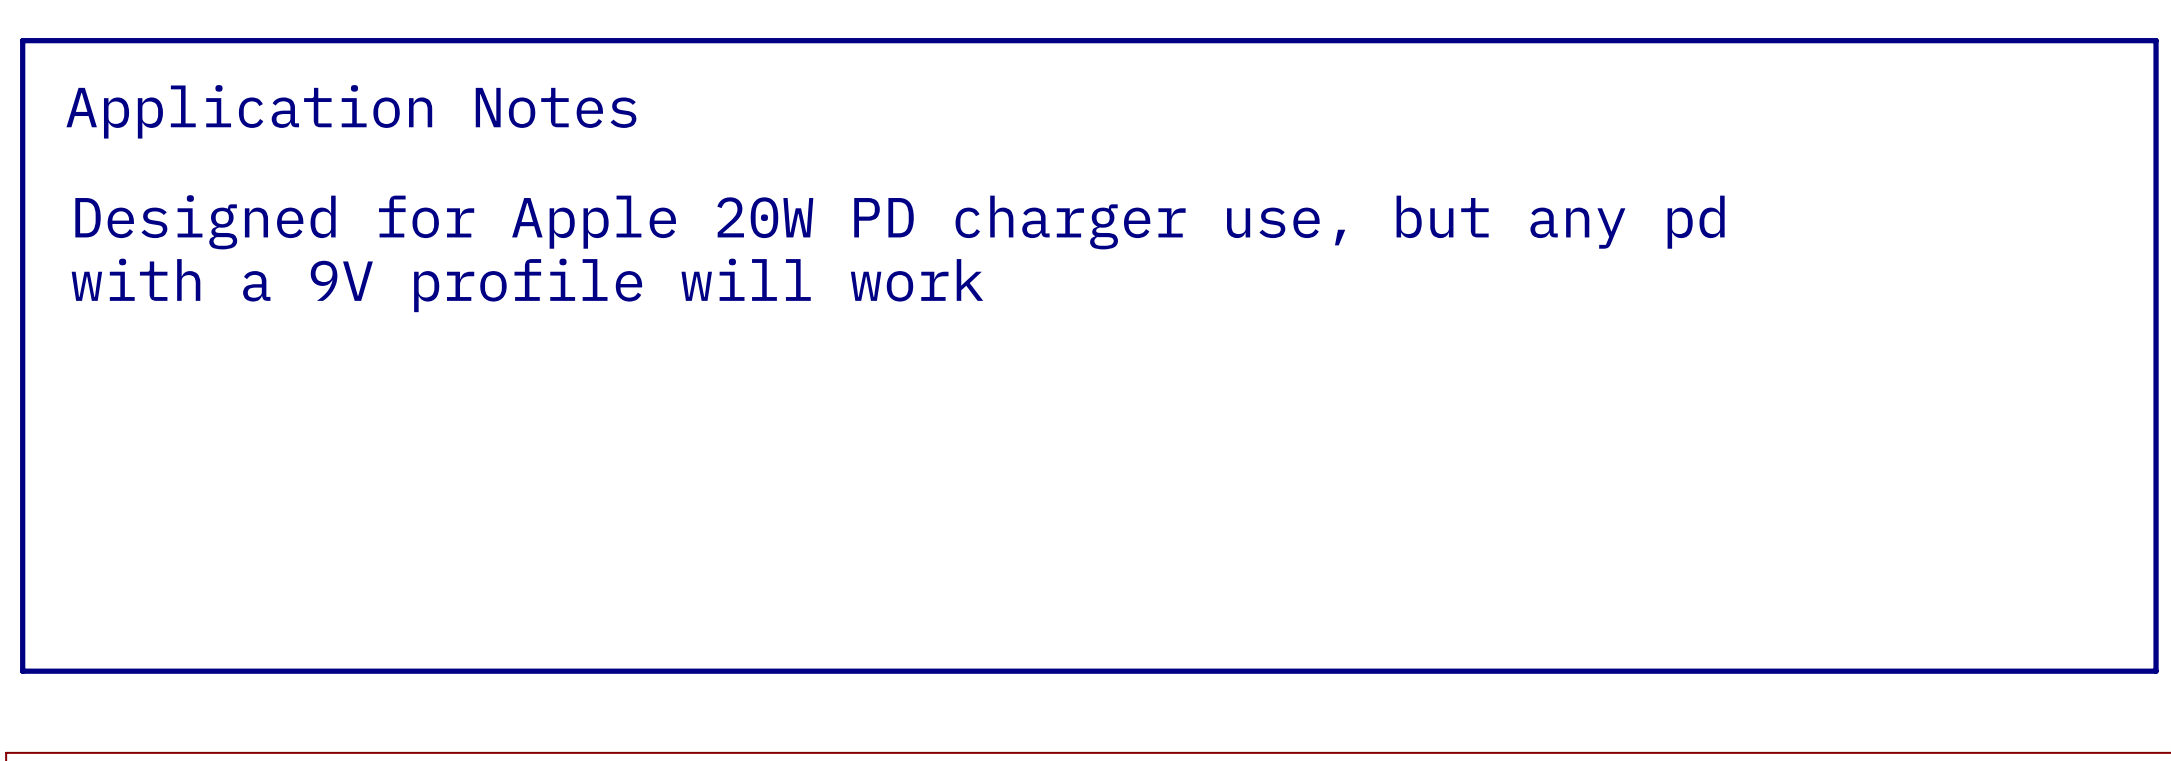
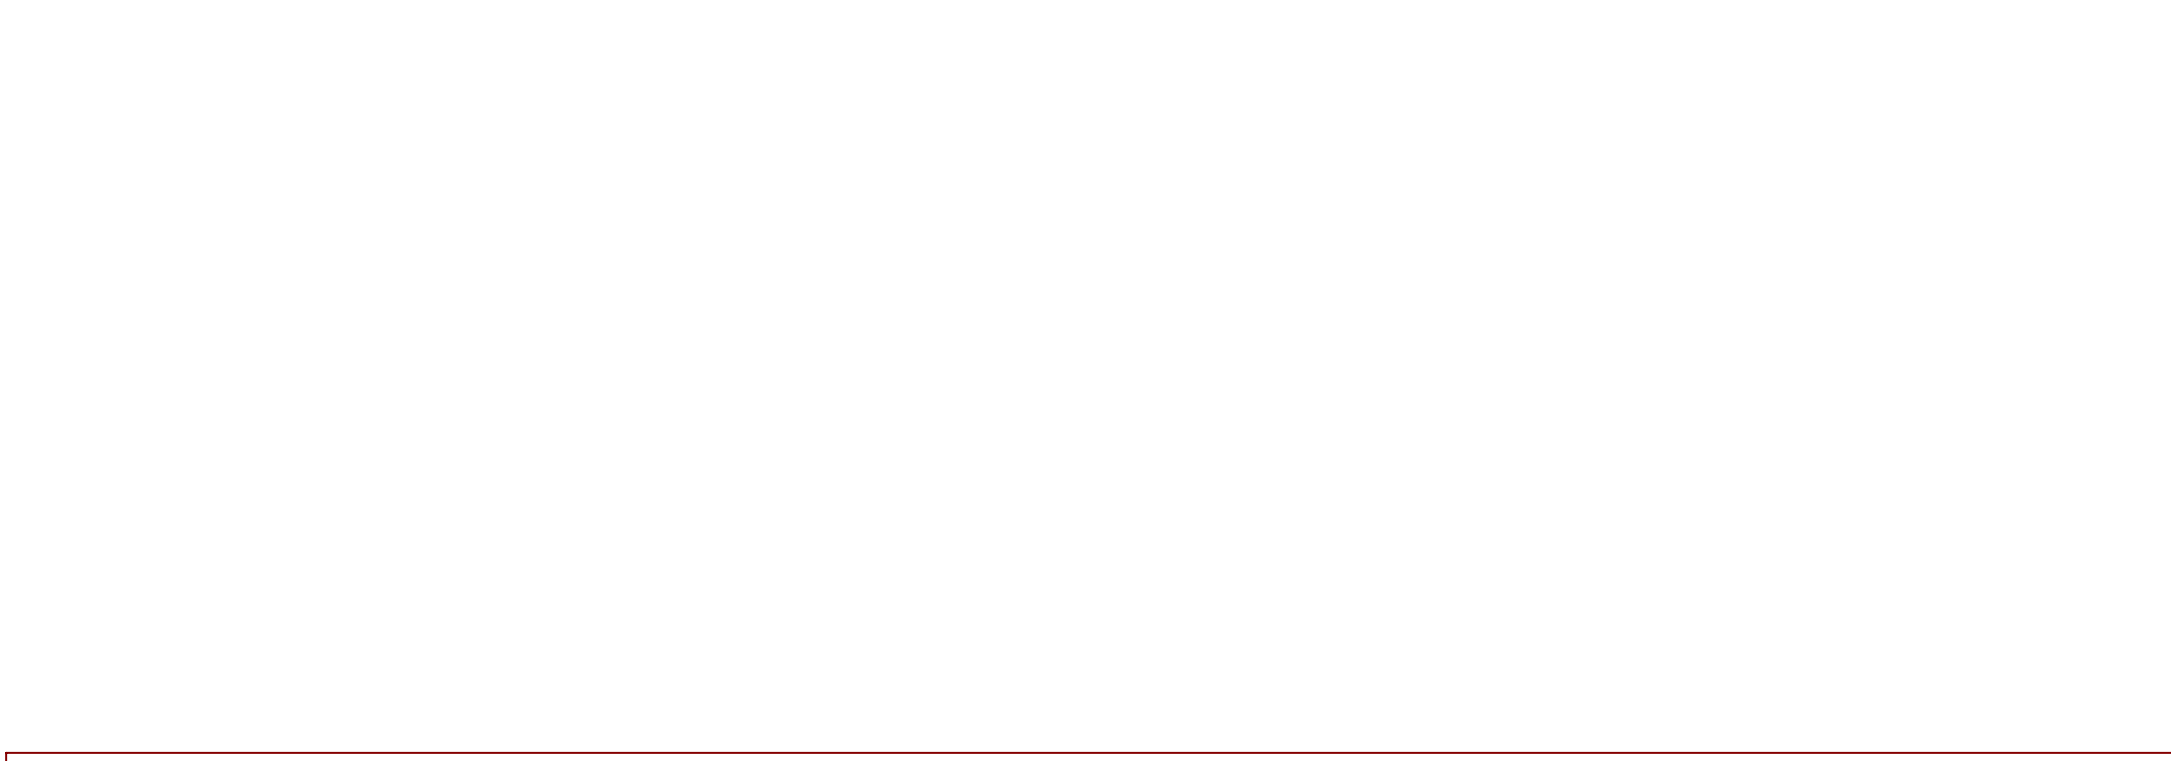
line: (22, 40) (2156, 40) (2156, 671) (22, 671) (22, 40) -> none
text: Application Notes (351, 111) -> none
text: Designed for Apple 20W PD charger use, but any pd (899, 222) -> none
text: with a 9V profile will work (527, 285) -> none

